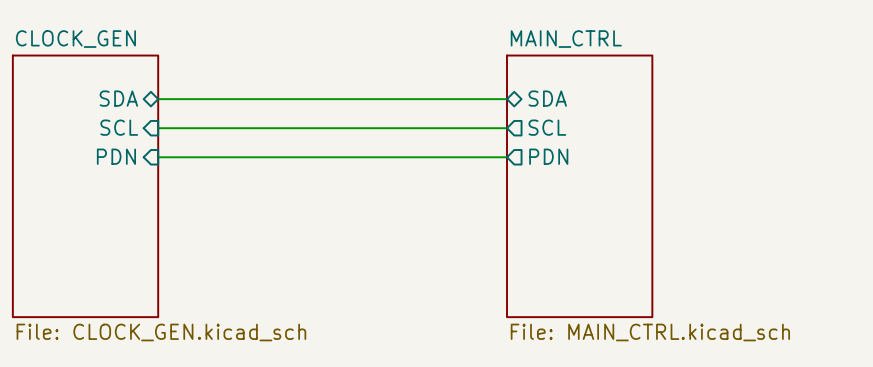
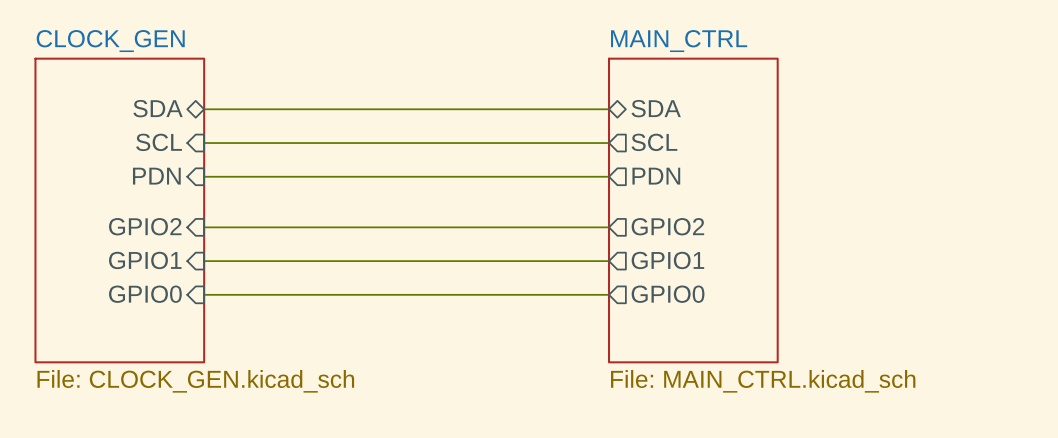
sheet pin: none -> GPIO2 (145, 226)
wire: none -> (204, 227) (609, 227)
sheet pin: none -> GPIO2 (667, 226)
sheet pin: none -> GPIO1 (145, 260)
wire: none -> (204, 261) (609, 261)
sheet pin: none -> GPIO1 (667, 260)
sheet pin: none -> GPIO0 (145, 294)
sheet pin: none -> GPIO0 (668, 294)
wire: none -> (204, 294) (609, 294)

